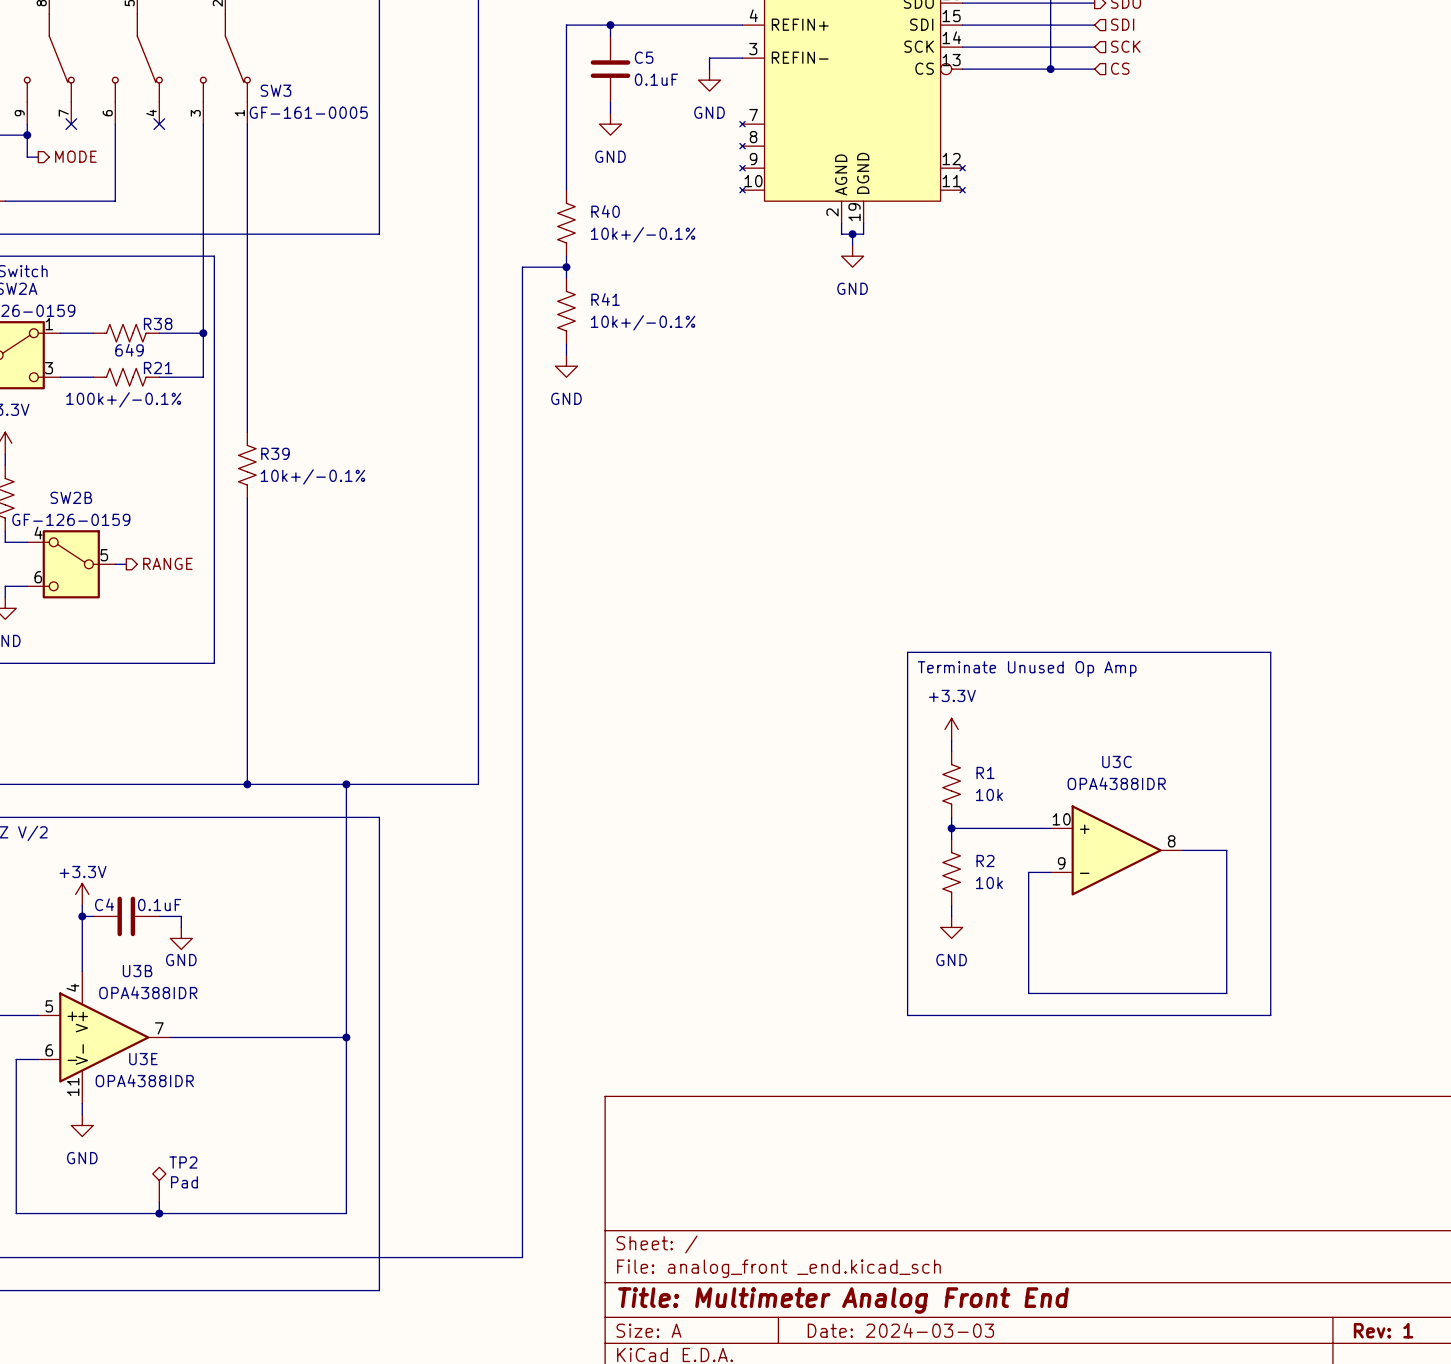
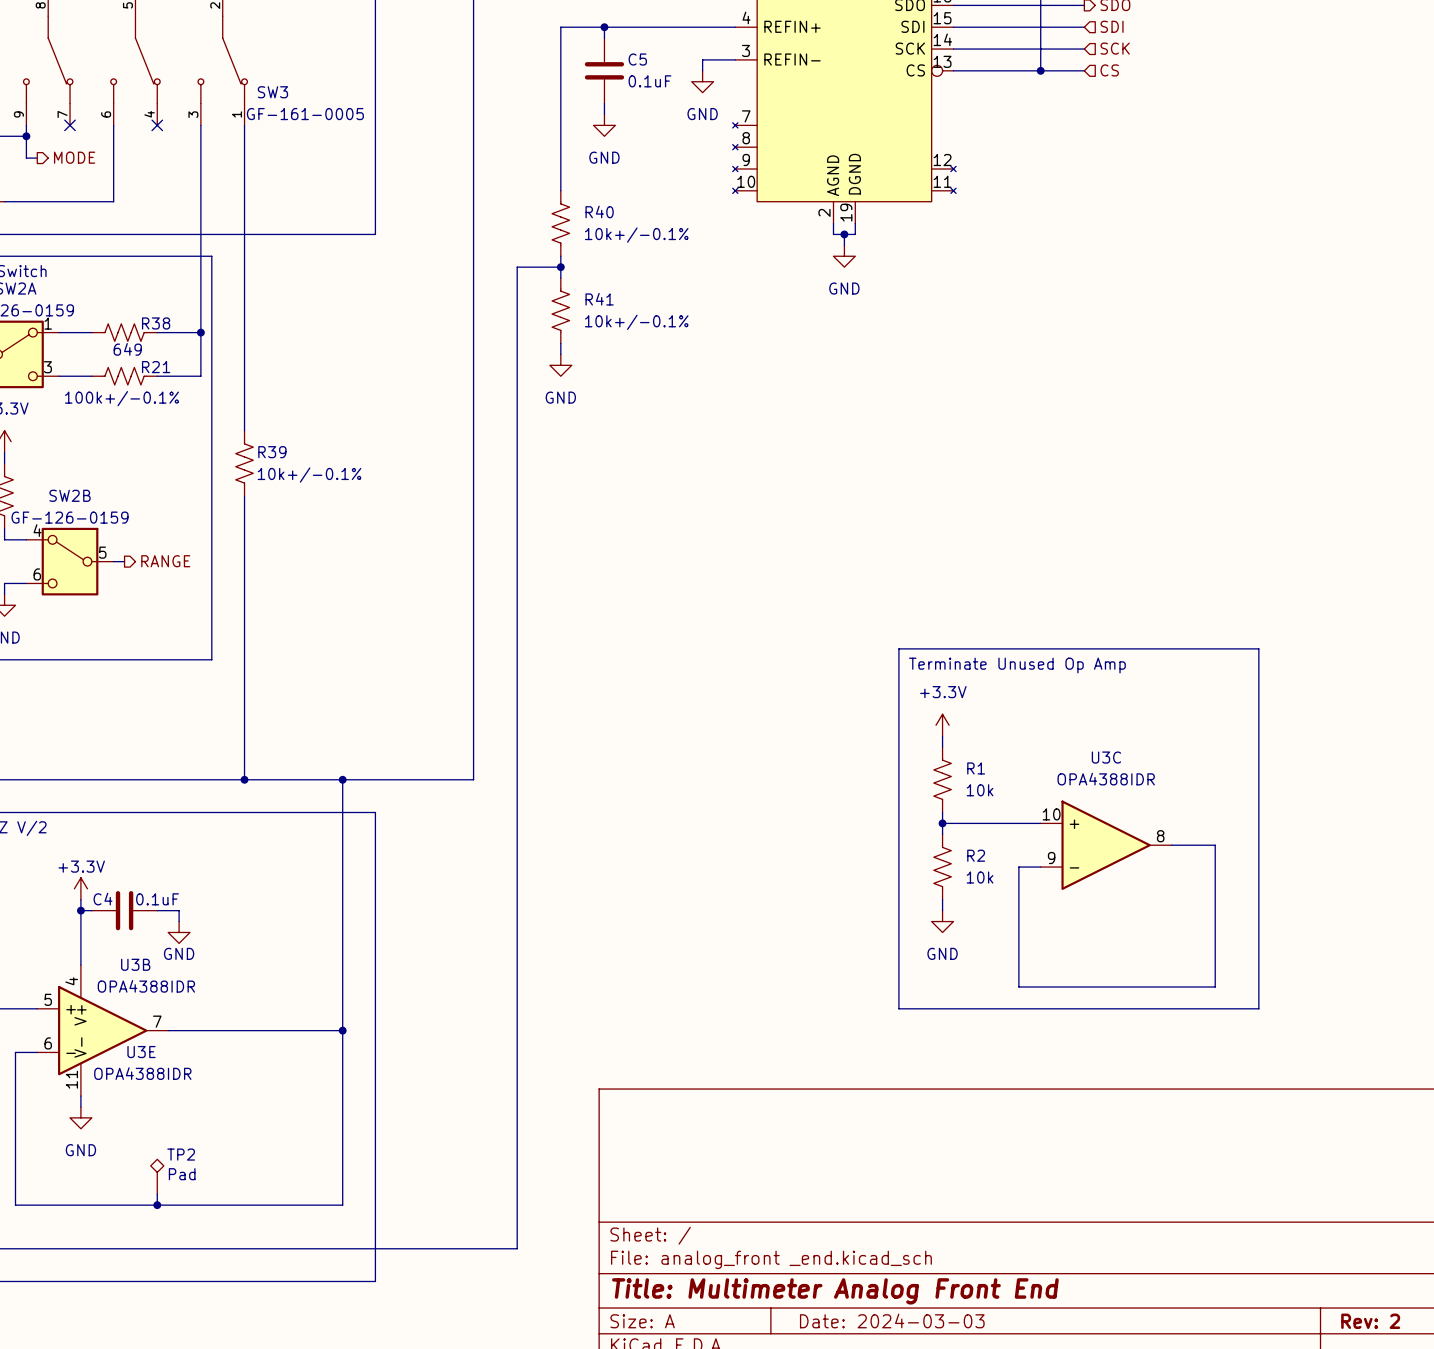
title block: Rev: 1 (1383, 1330) -> Rev: 2 (1370, 1321)

